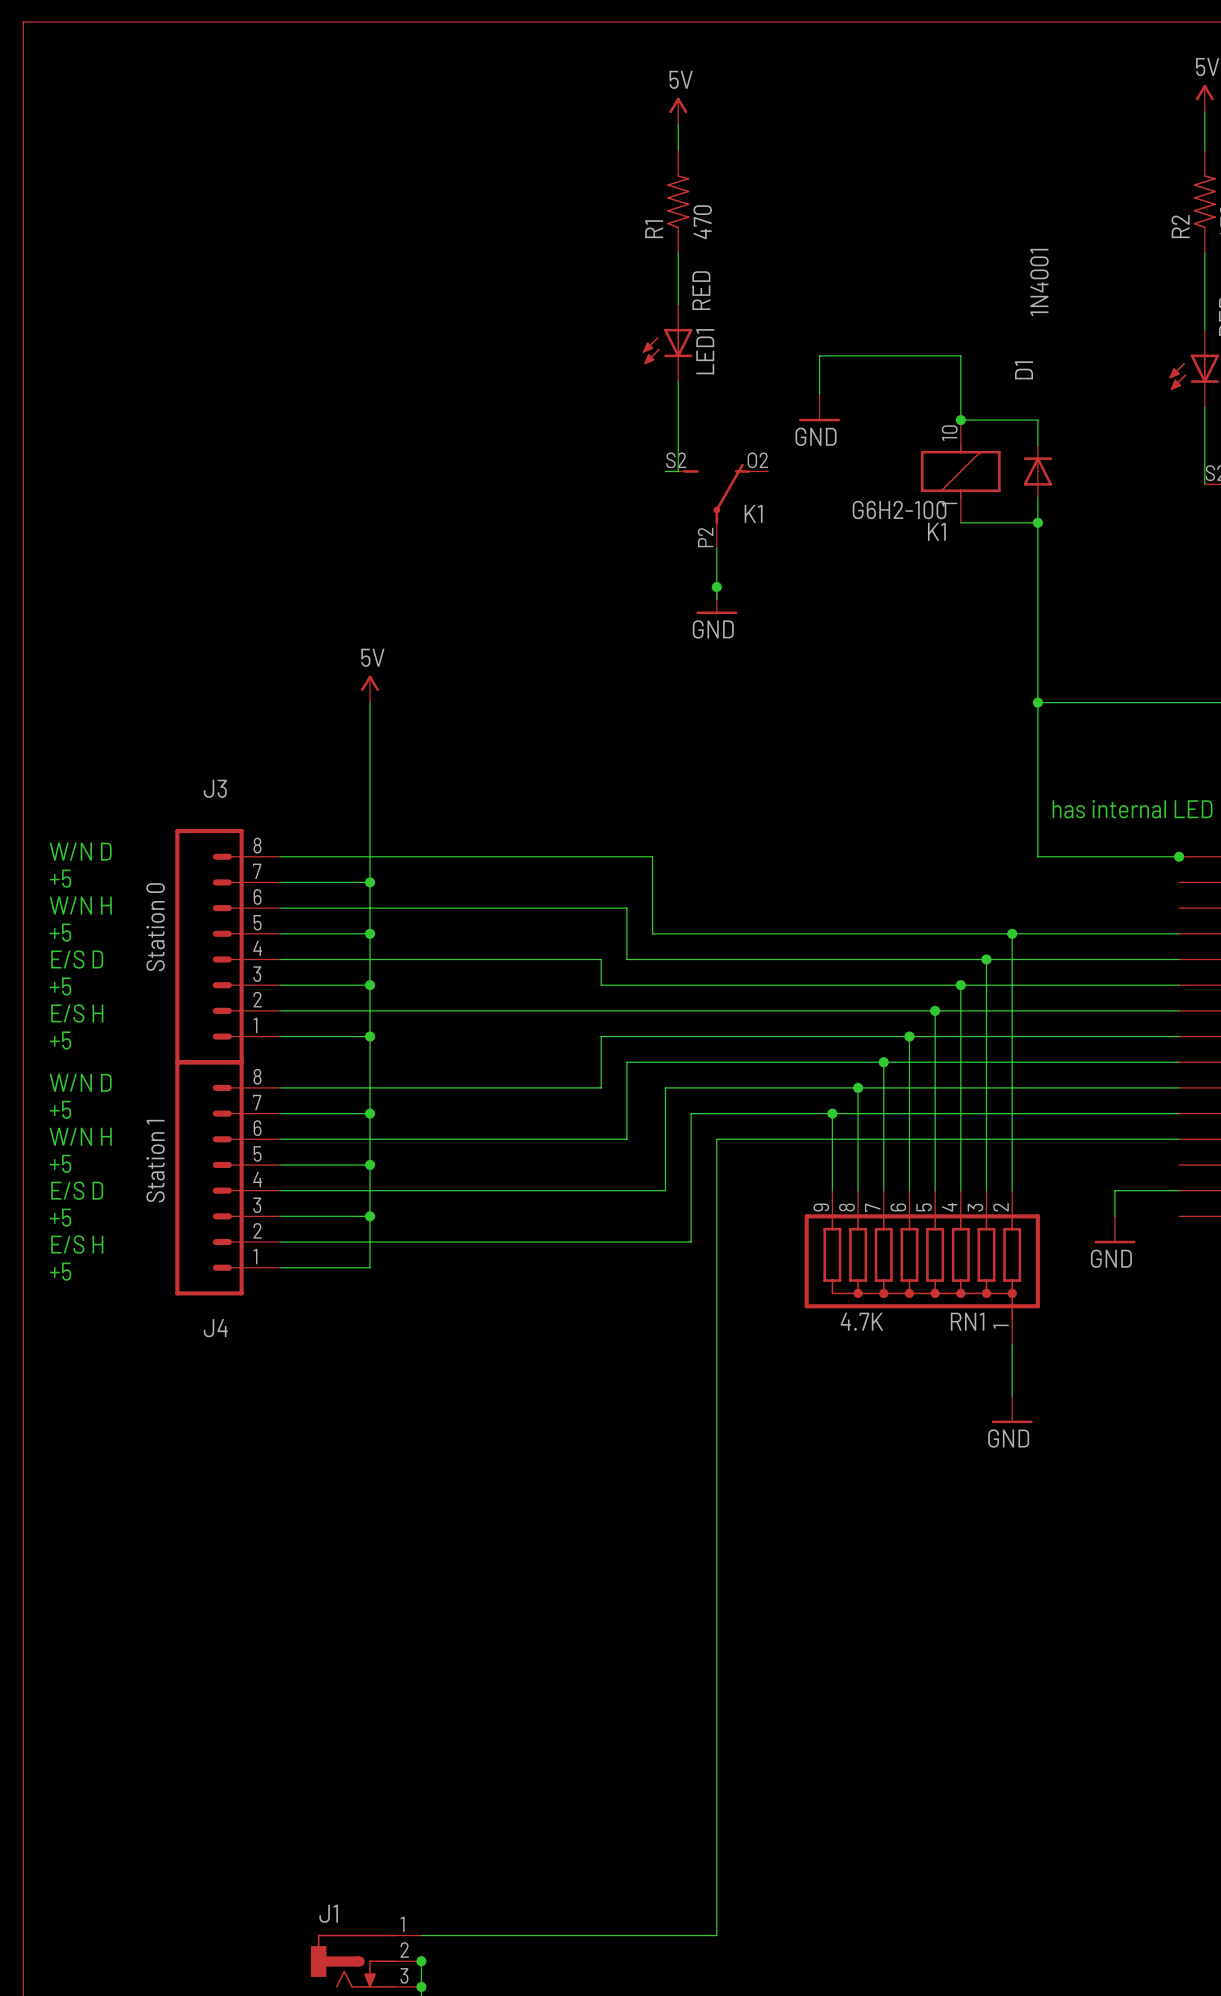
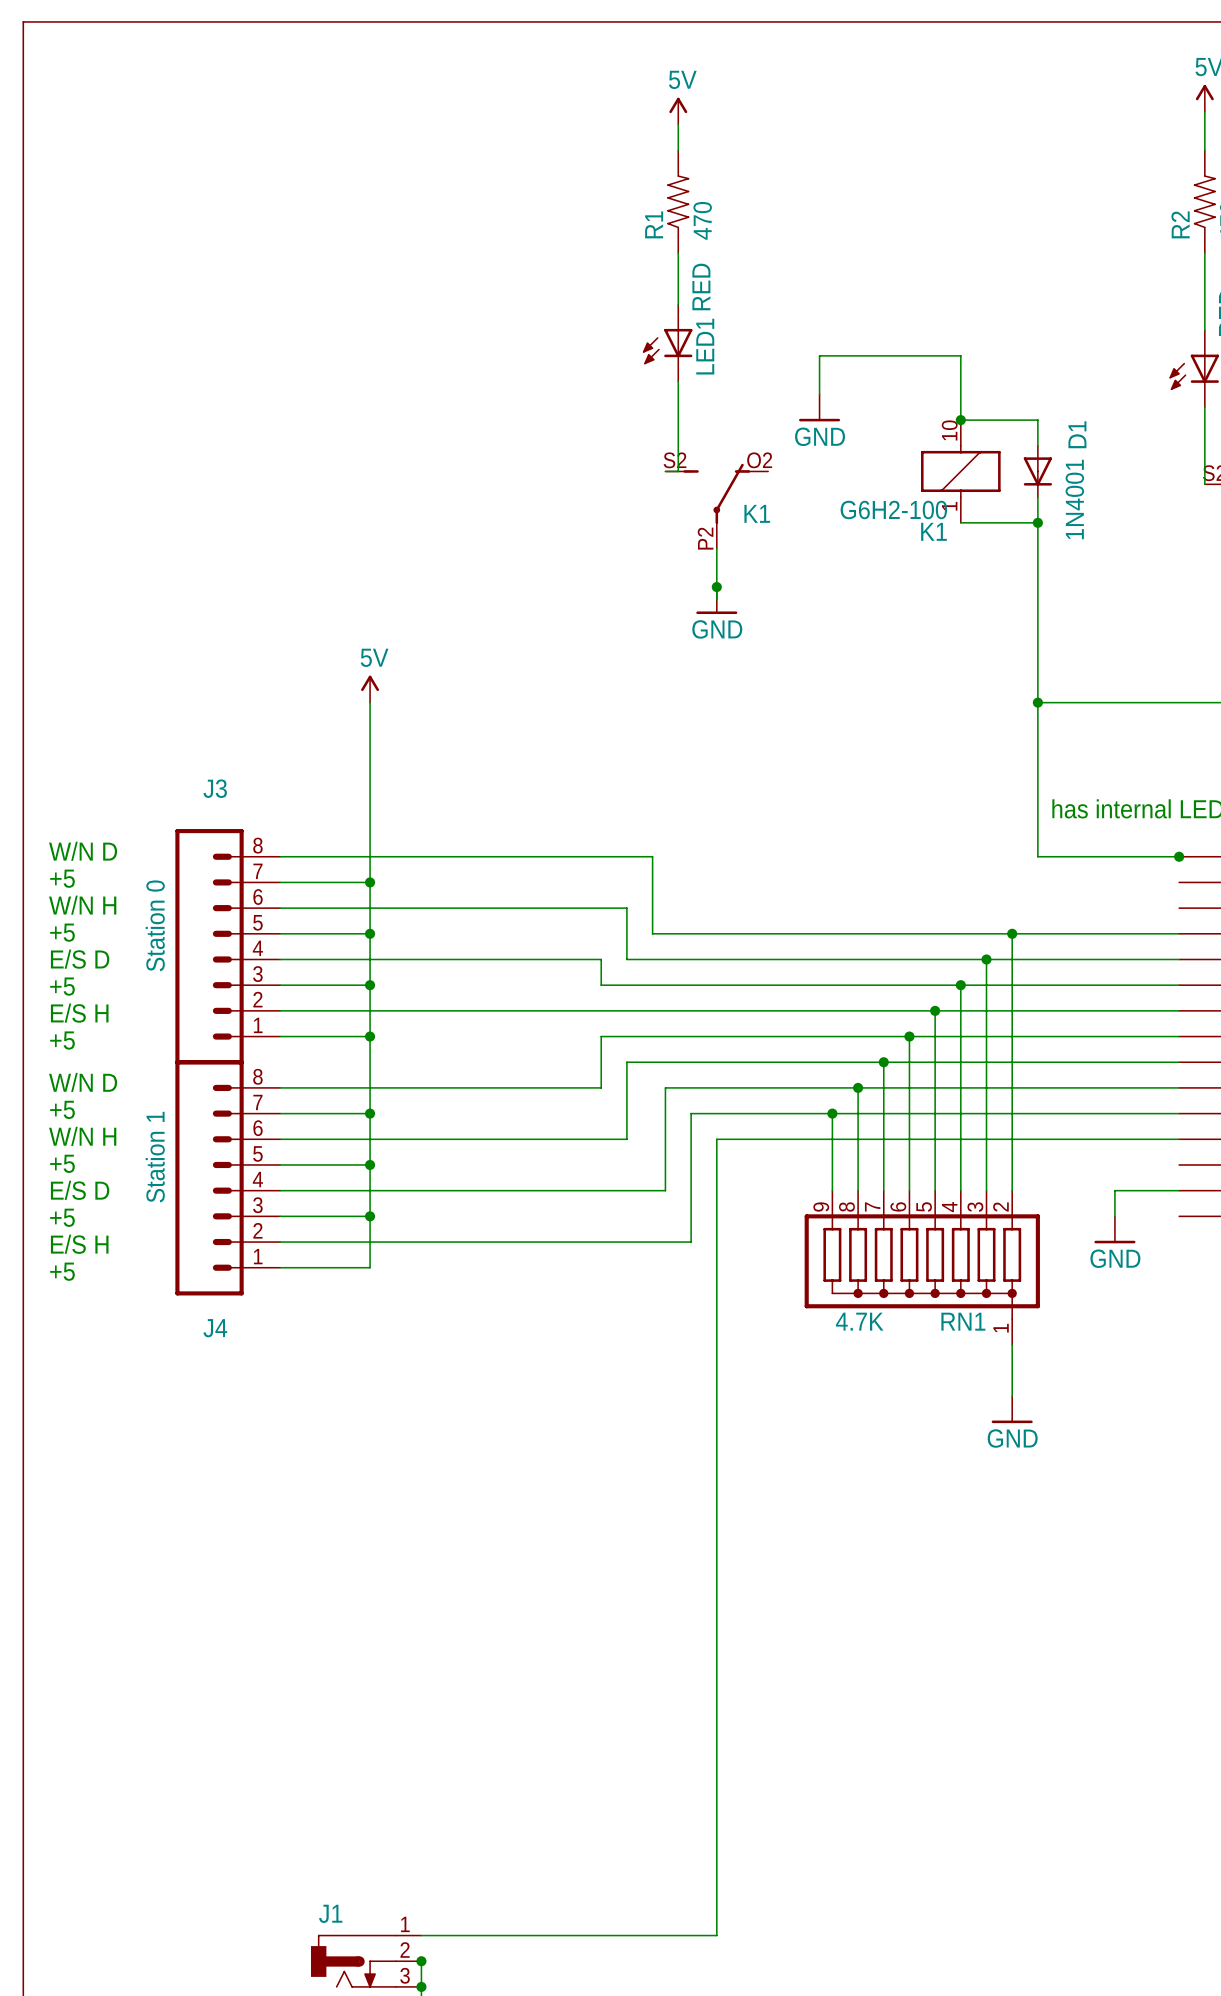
D1 value position: 1N4001 (1039, 282) -> 1N4001 (1074, 499)
D1 name position: D1 (1024, 370) -> D1 (1077, 434)
D1 rotation: 0° (1037, 471) -> 180° (1037, 471)

